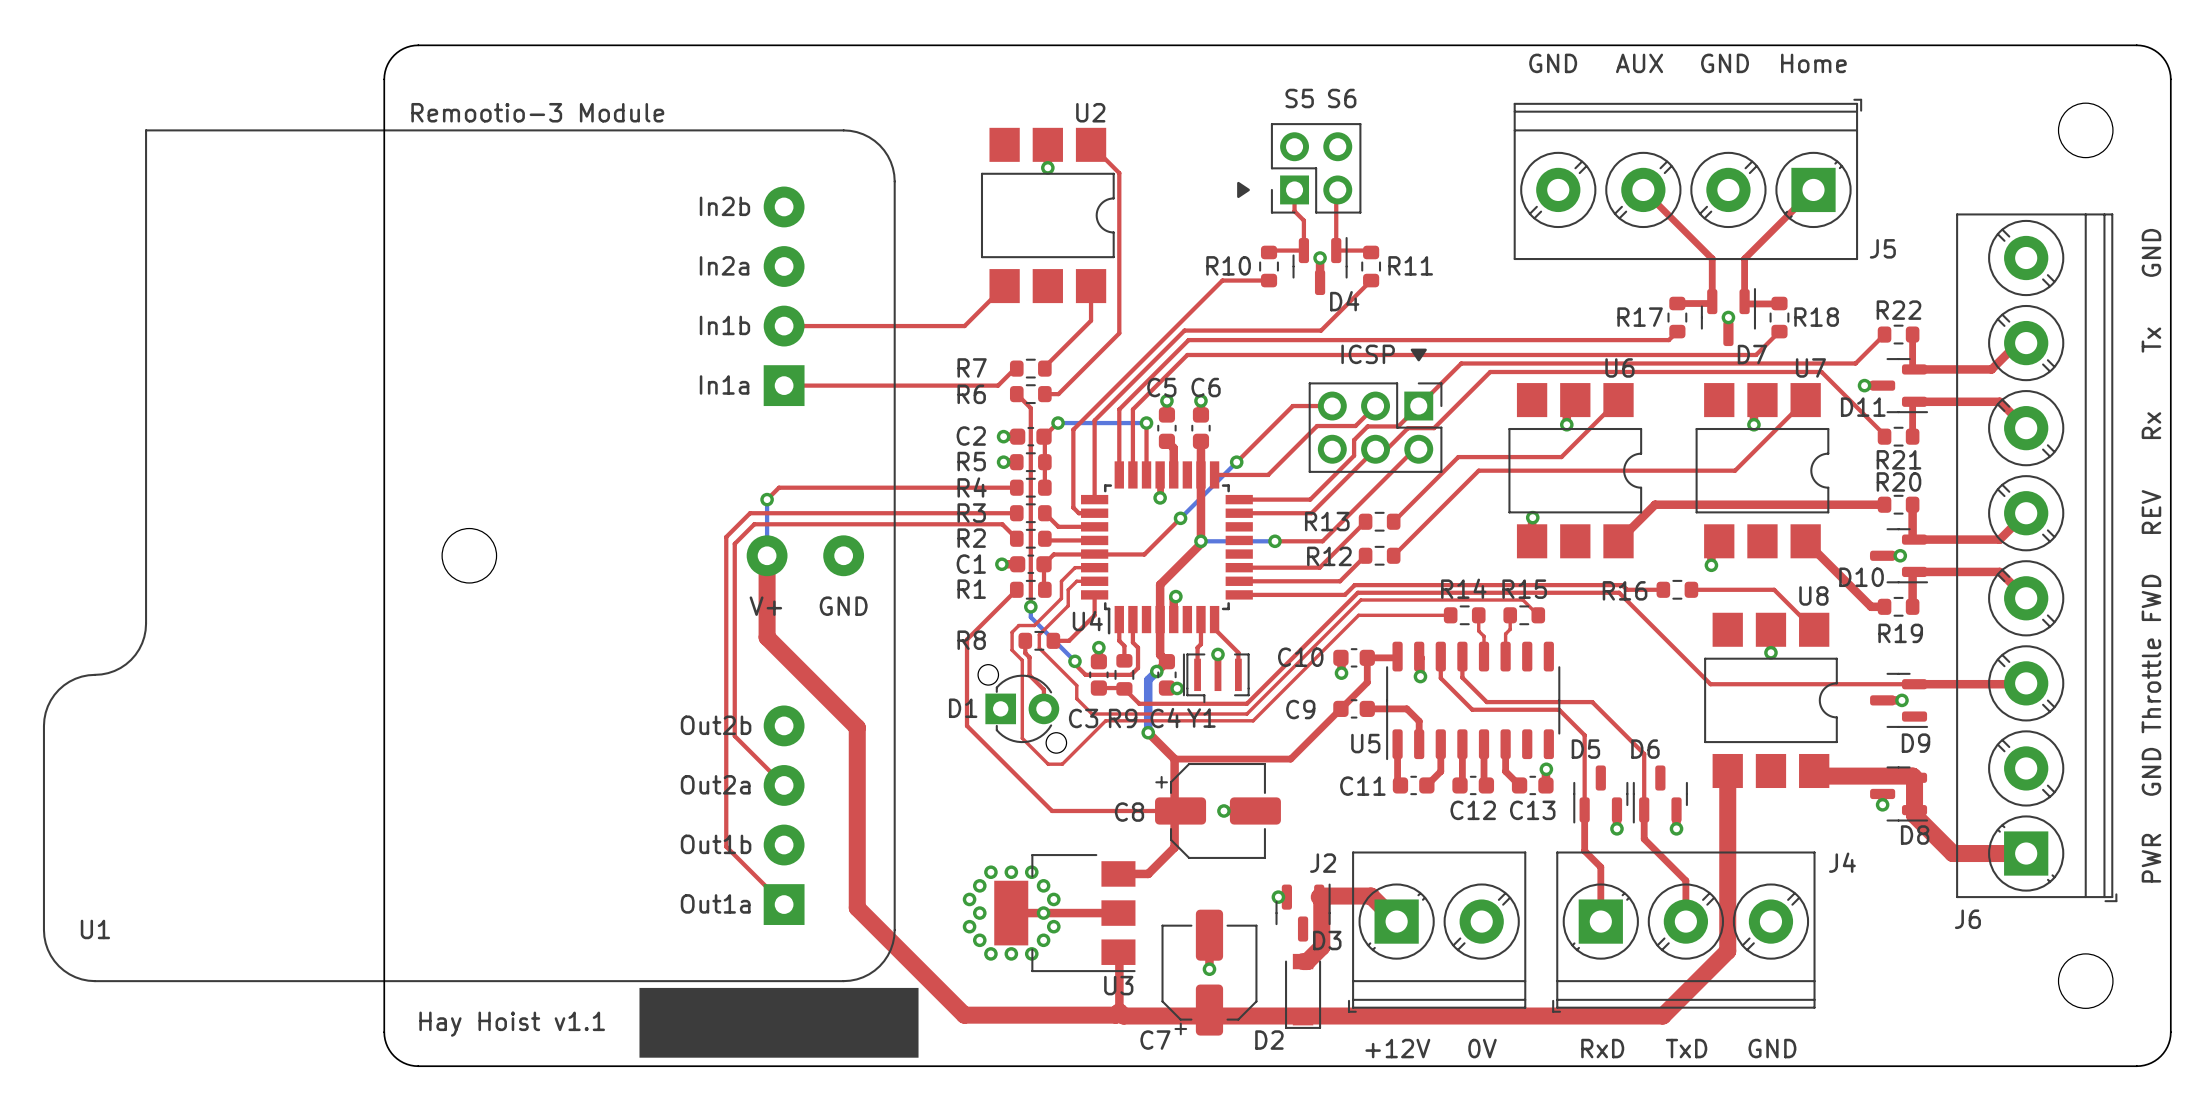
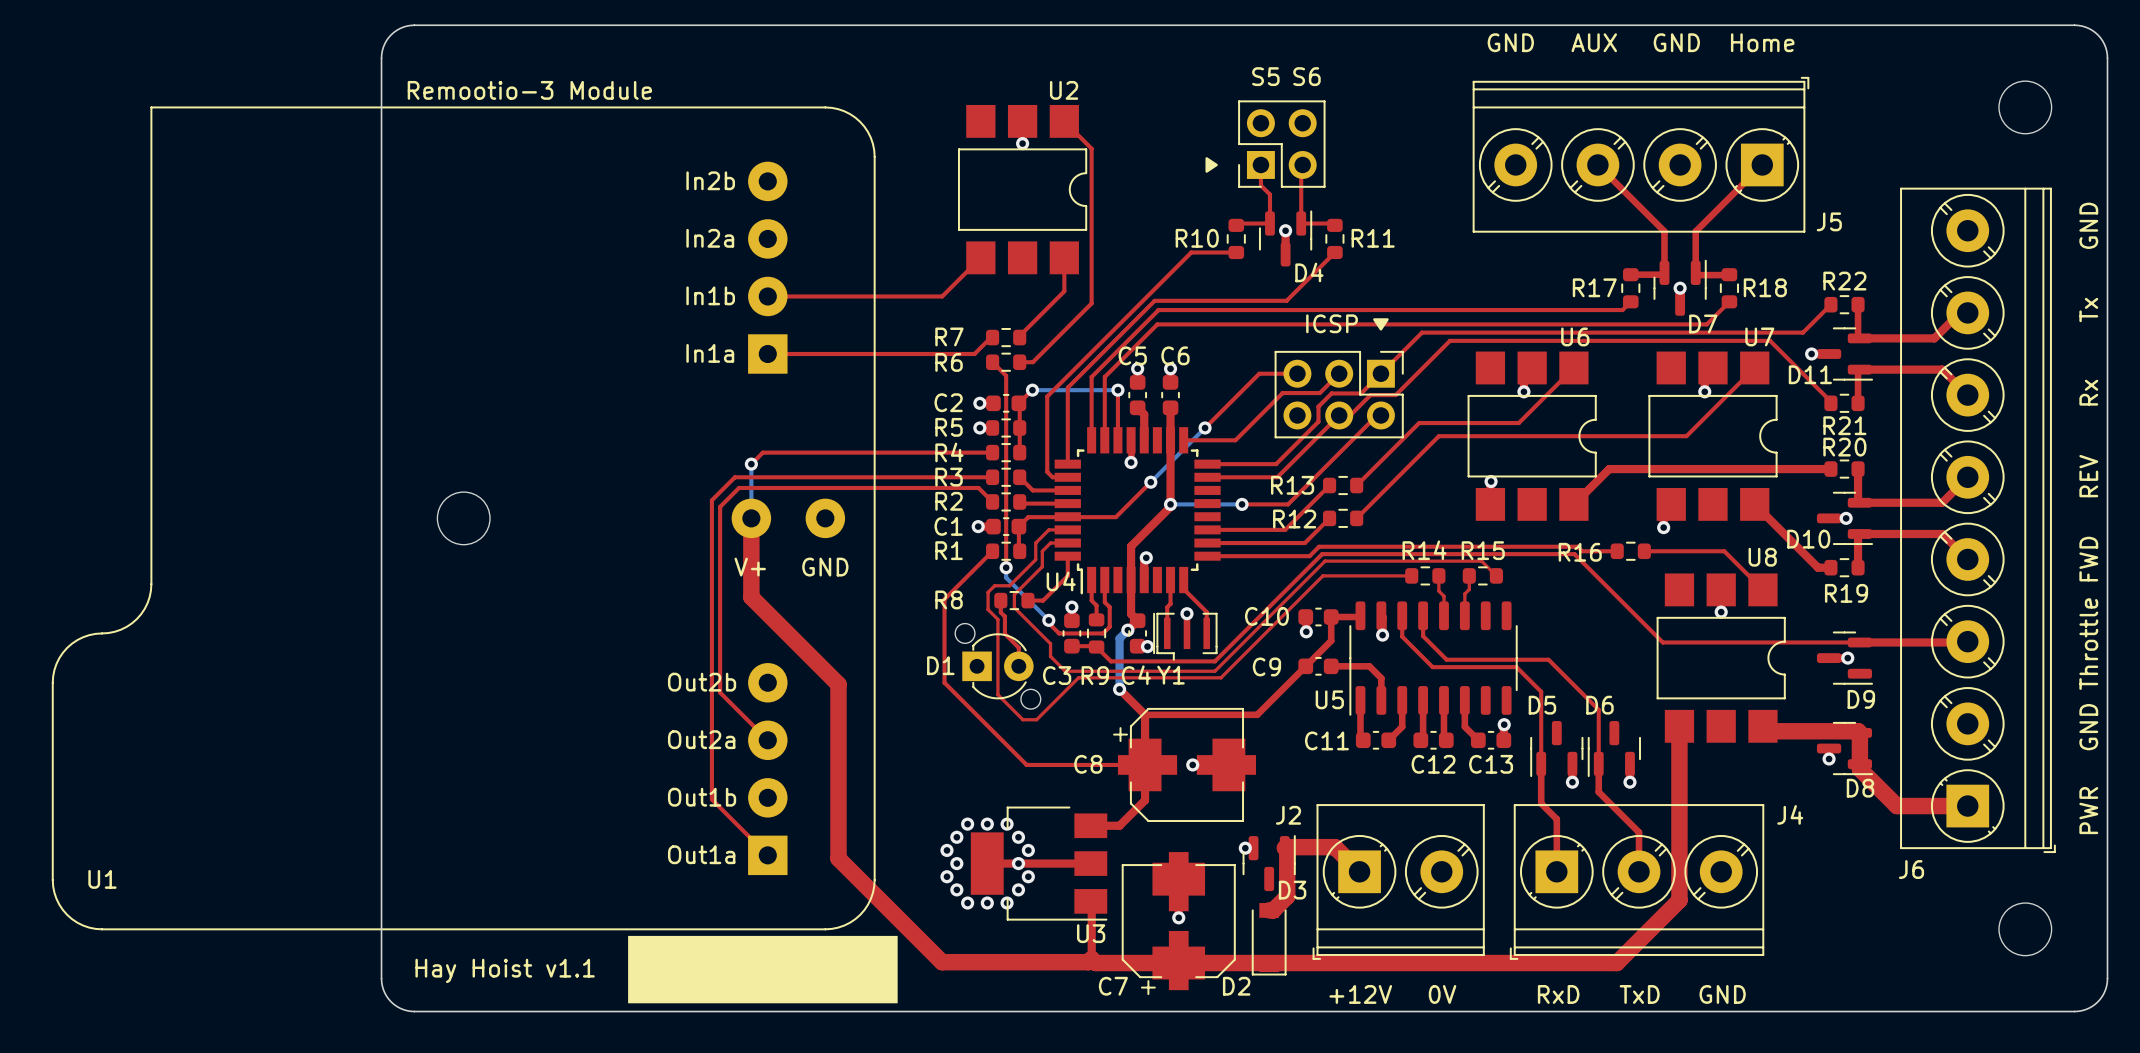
C8 footprint: [1155, 763, 1281, 859] -> [1113, 707, 1257, 822]
C7 footprint: [1161, 909, 1258, 1036] -> [1121, 852, 1236, 996]

